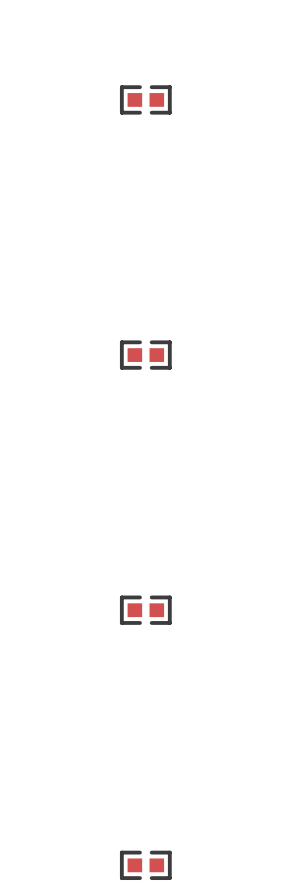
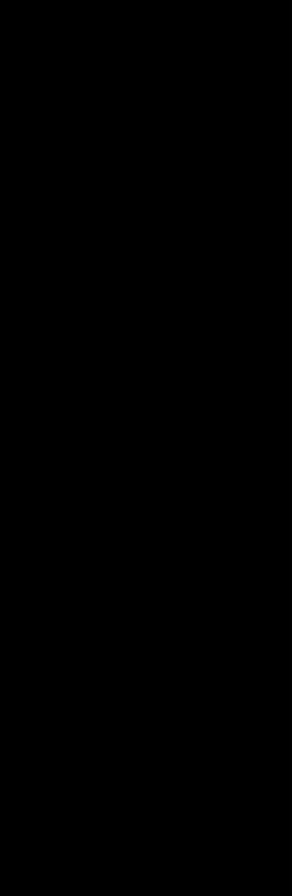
part: (145, 99) -> none
part: (145, 355) -> none
part: (145, 610) -> none
part: (145, 865) -> none

